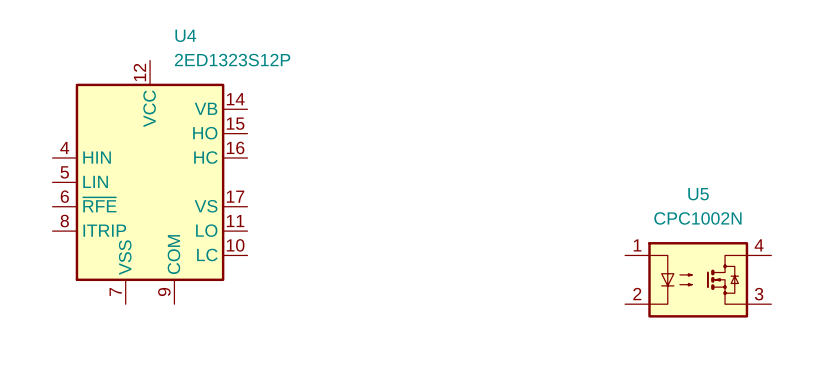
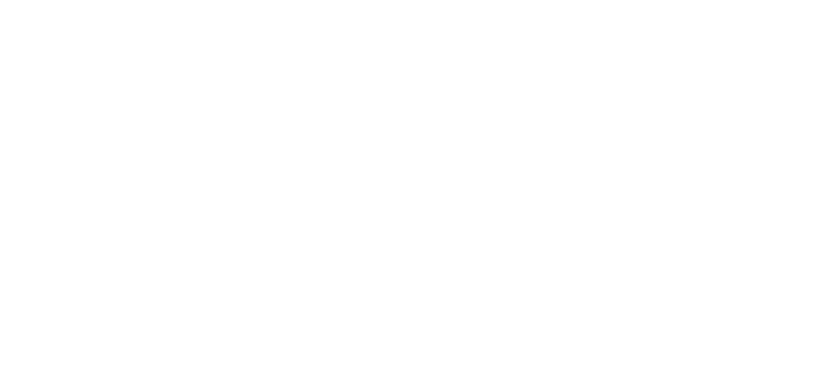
U4: 2ED1323S12P (150, 182) -> none
U5: CPC1002N (698, 279) -> none

